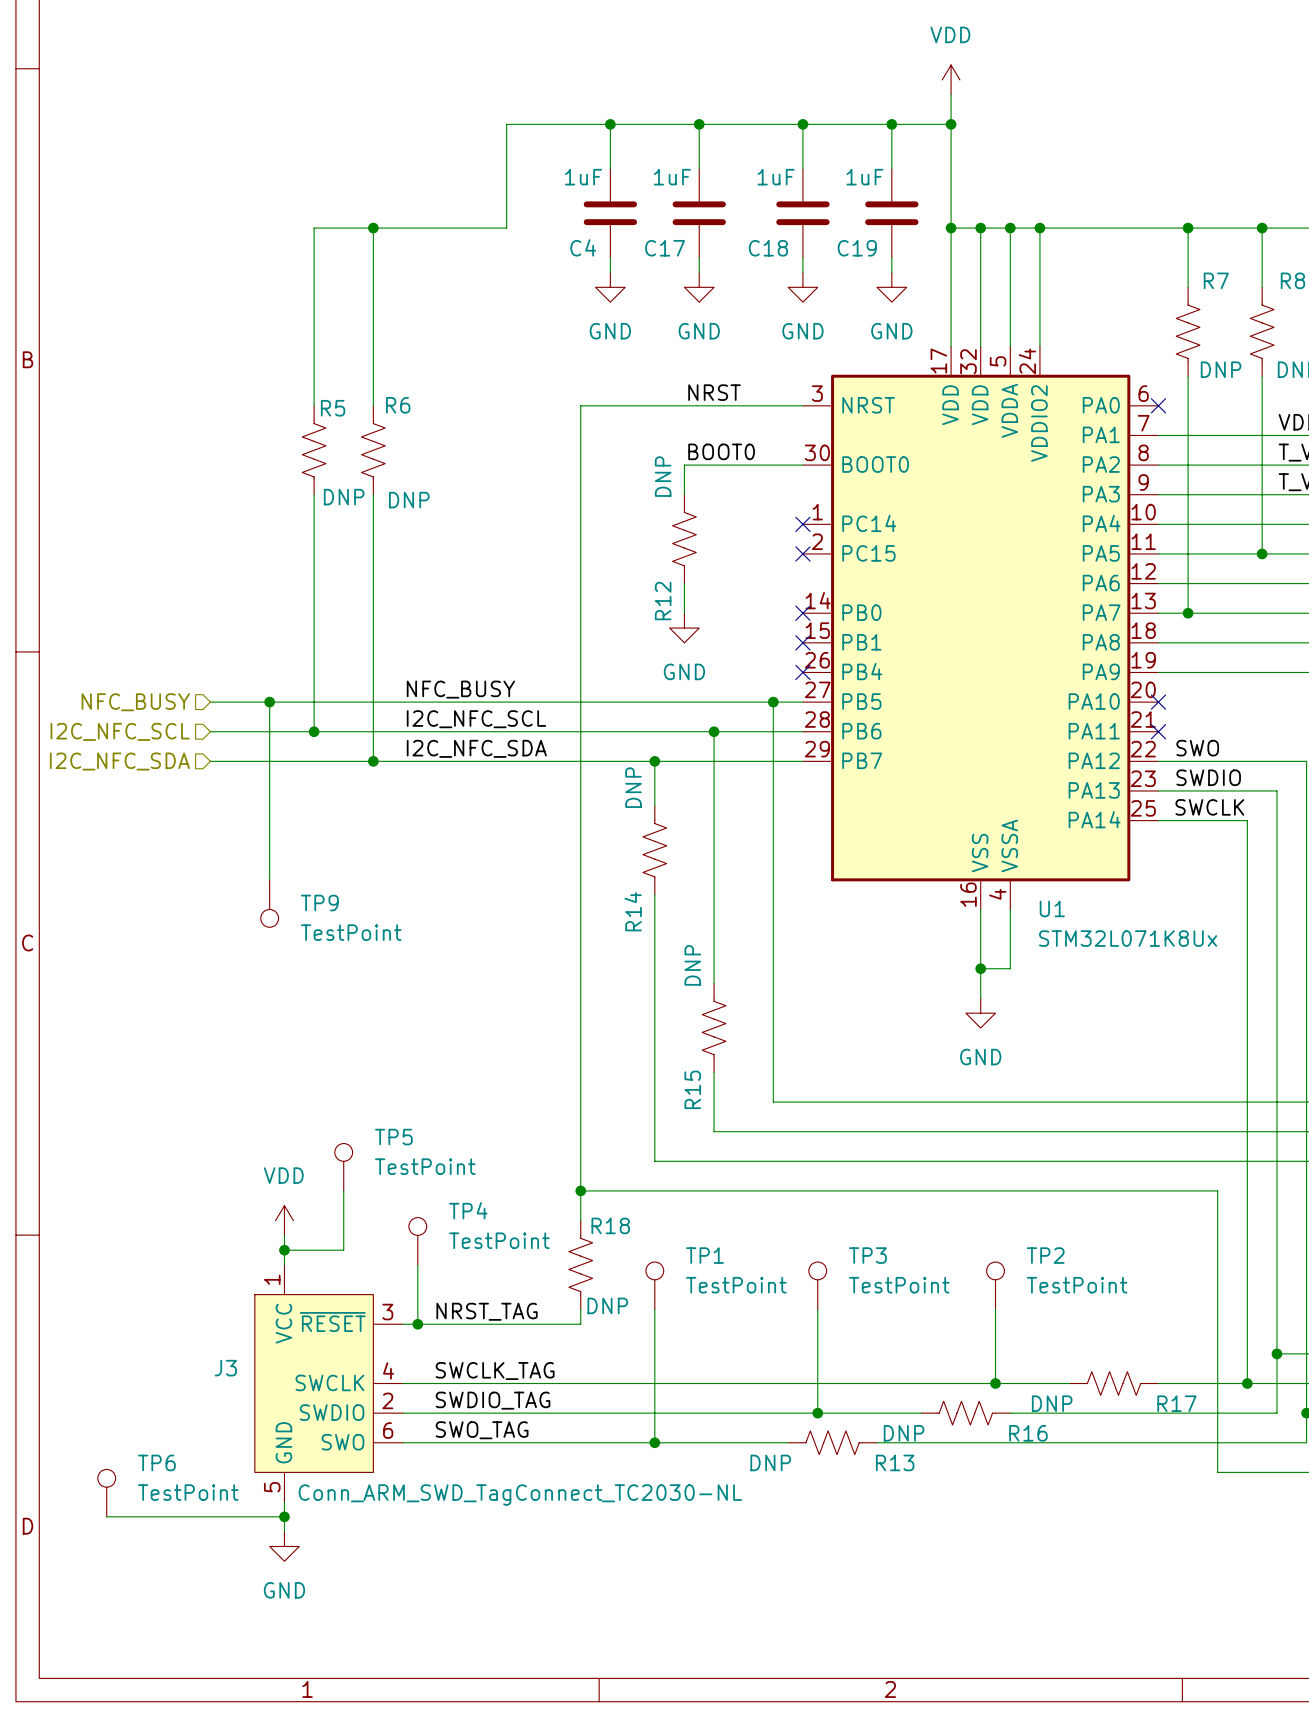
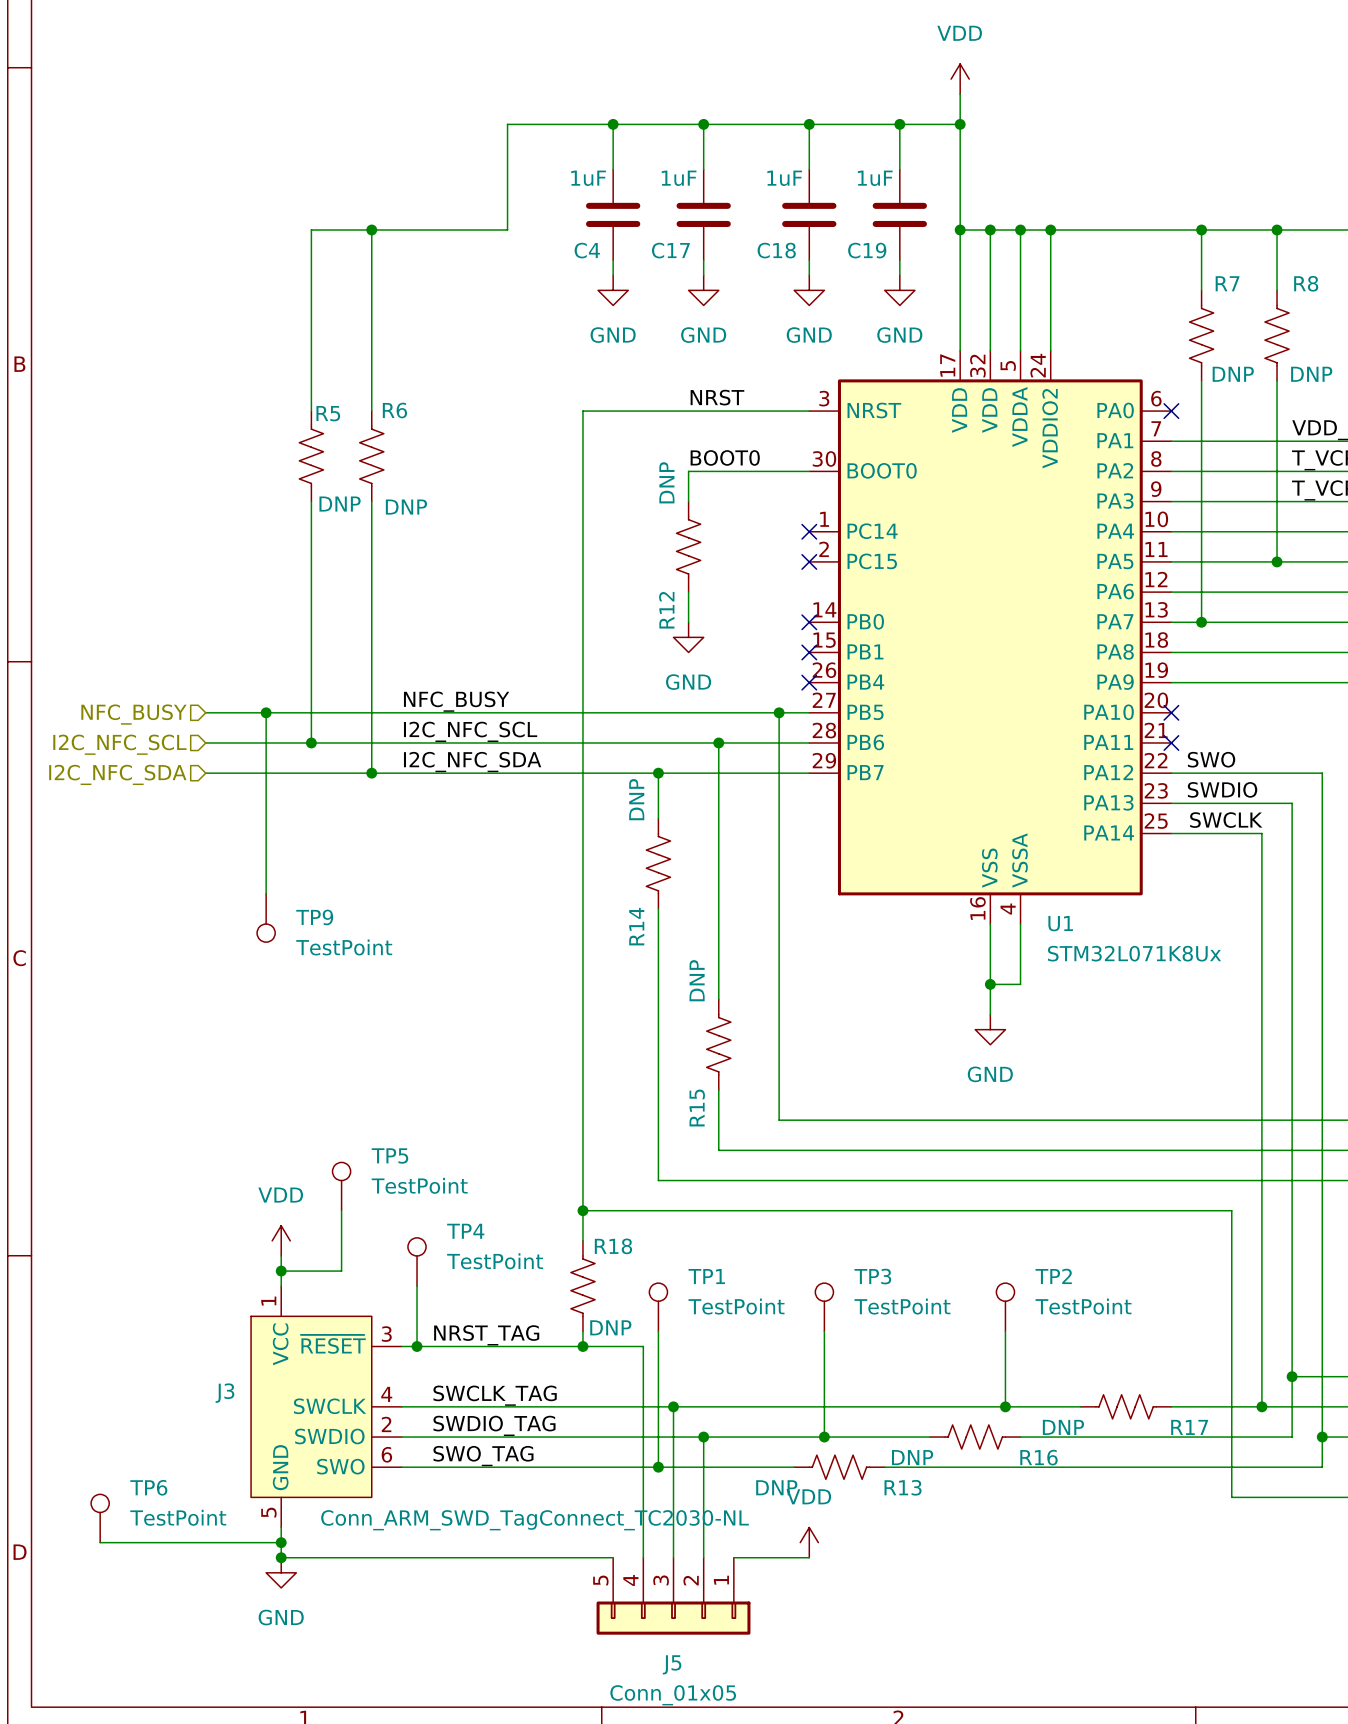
wire: none -> (582, 1346) (643, 1346) (643, 1557)
junction: none -> (582, 1346)
wire: none -> (673, 1406) (673, 1557)
junction: none -> (673, 1406)
wire: none -> (703, 1437) (703, 1557)
junction: none -> (703, 1437)
power symbol: none -> VDD (809, 1542)
wire: none -> (281, 1557) (613, 1557)
junction: none -> (281, 1557)
wire: none -> (733, 1557) (809, 1557)
J5: none -> Conn_01x05 (673, 1596)

